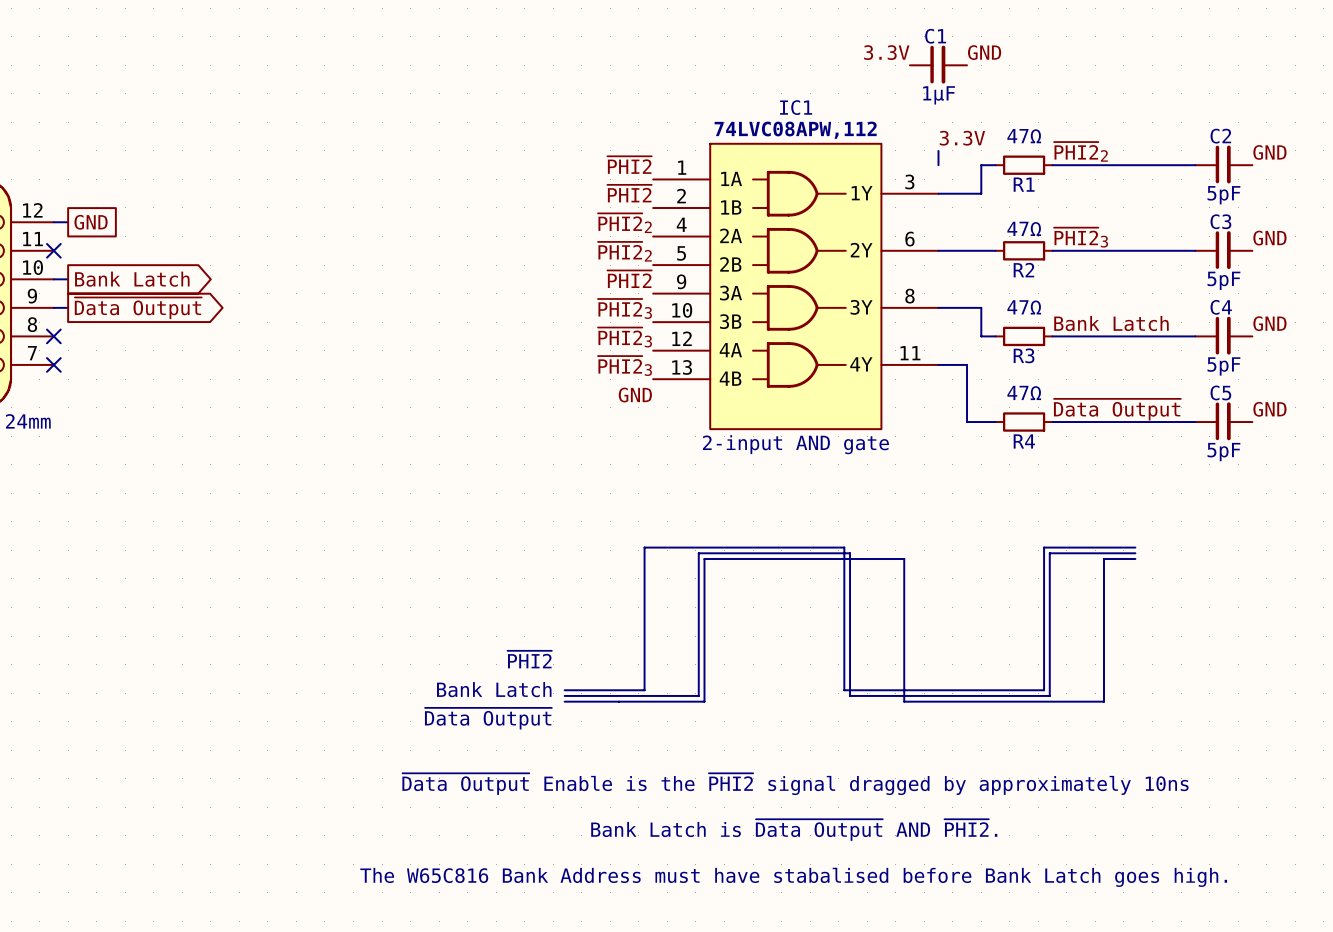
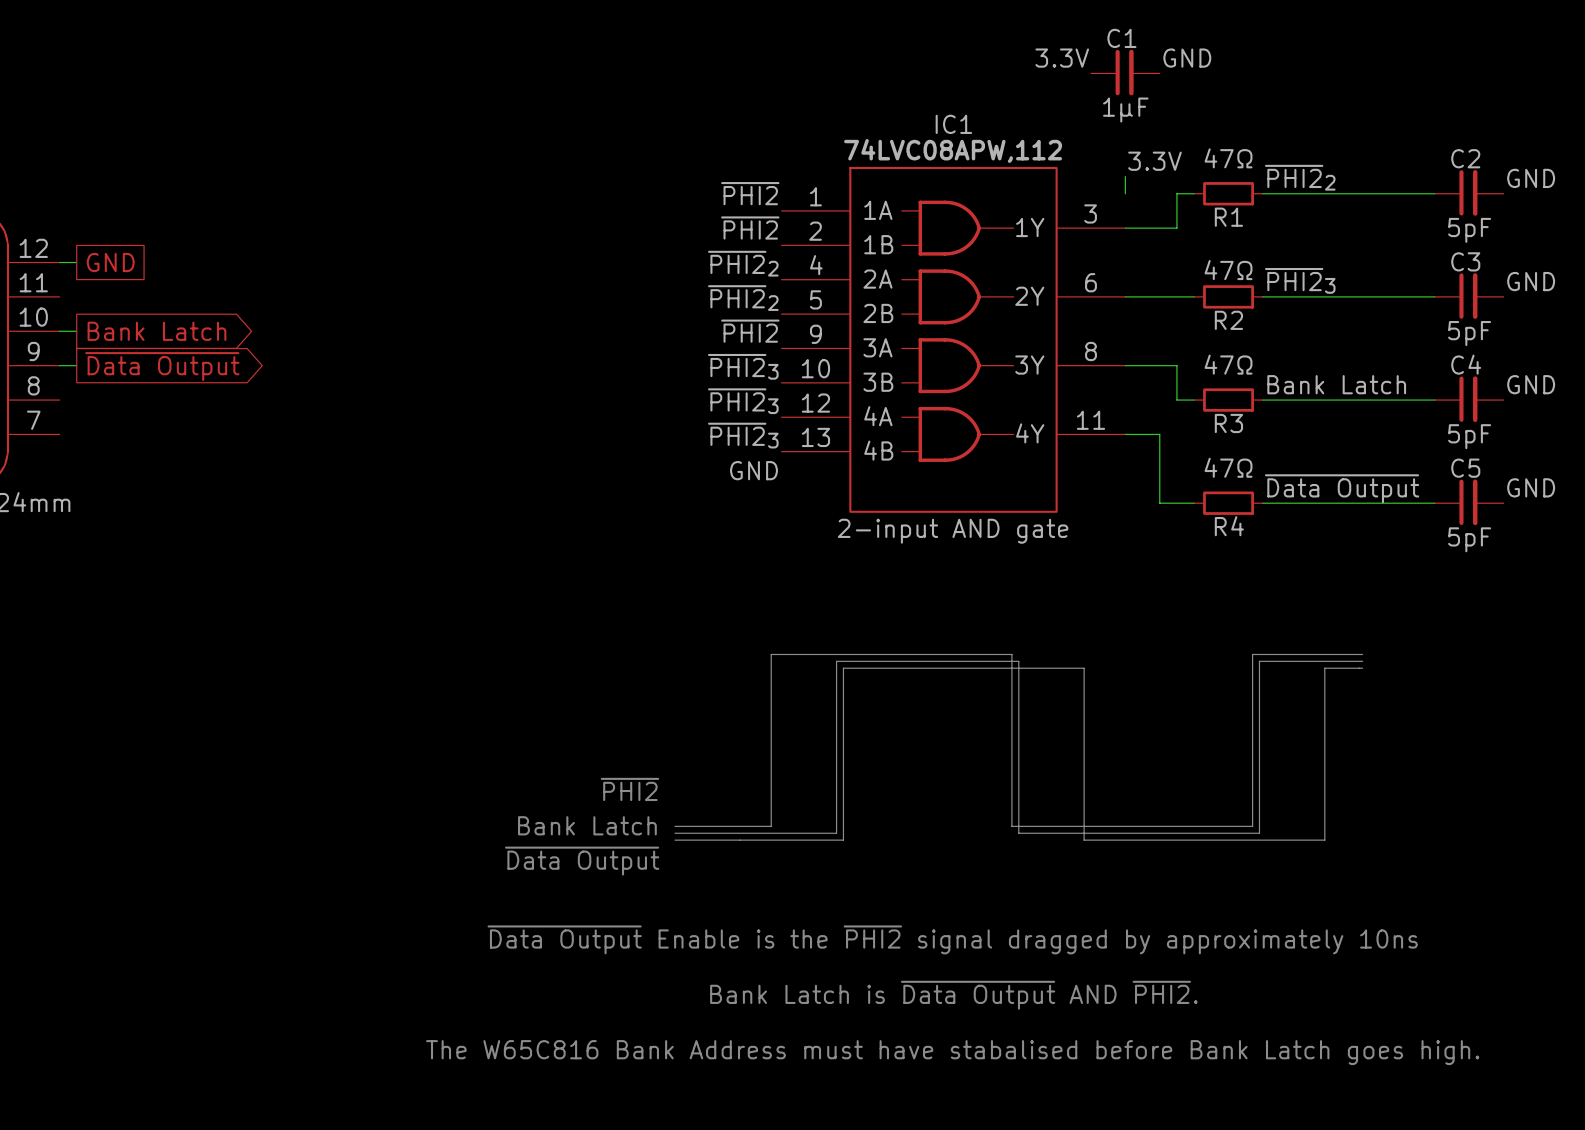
no-connect mark: (53, 250) -> none
no-connect mark: (53, 336) -> none
no-connect mark: (53, 364) -> none

